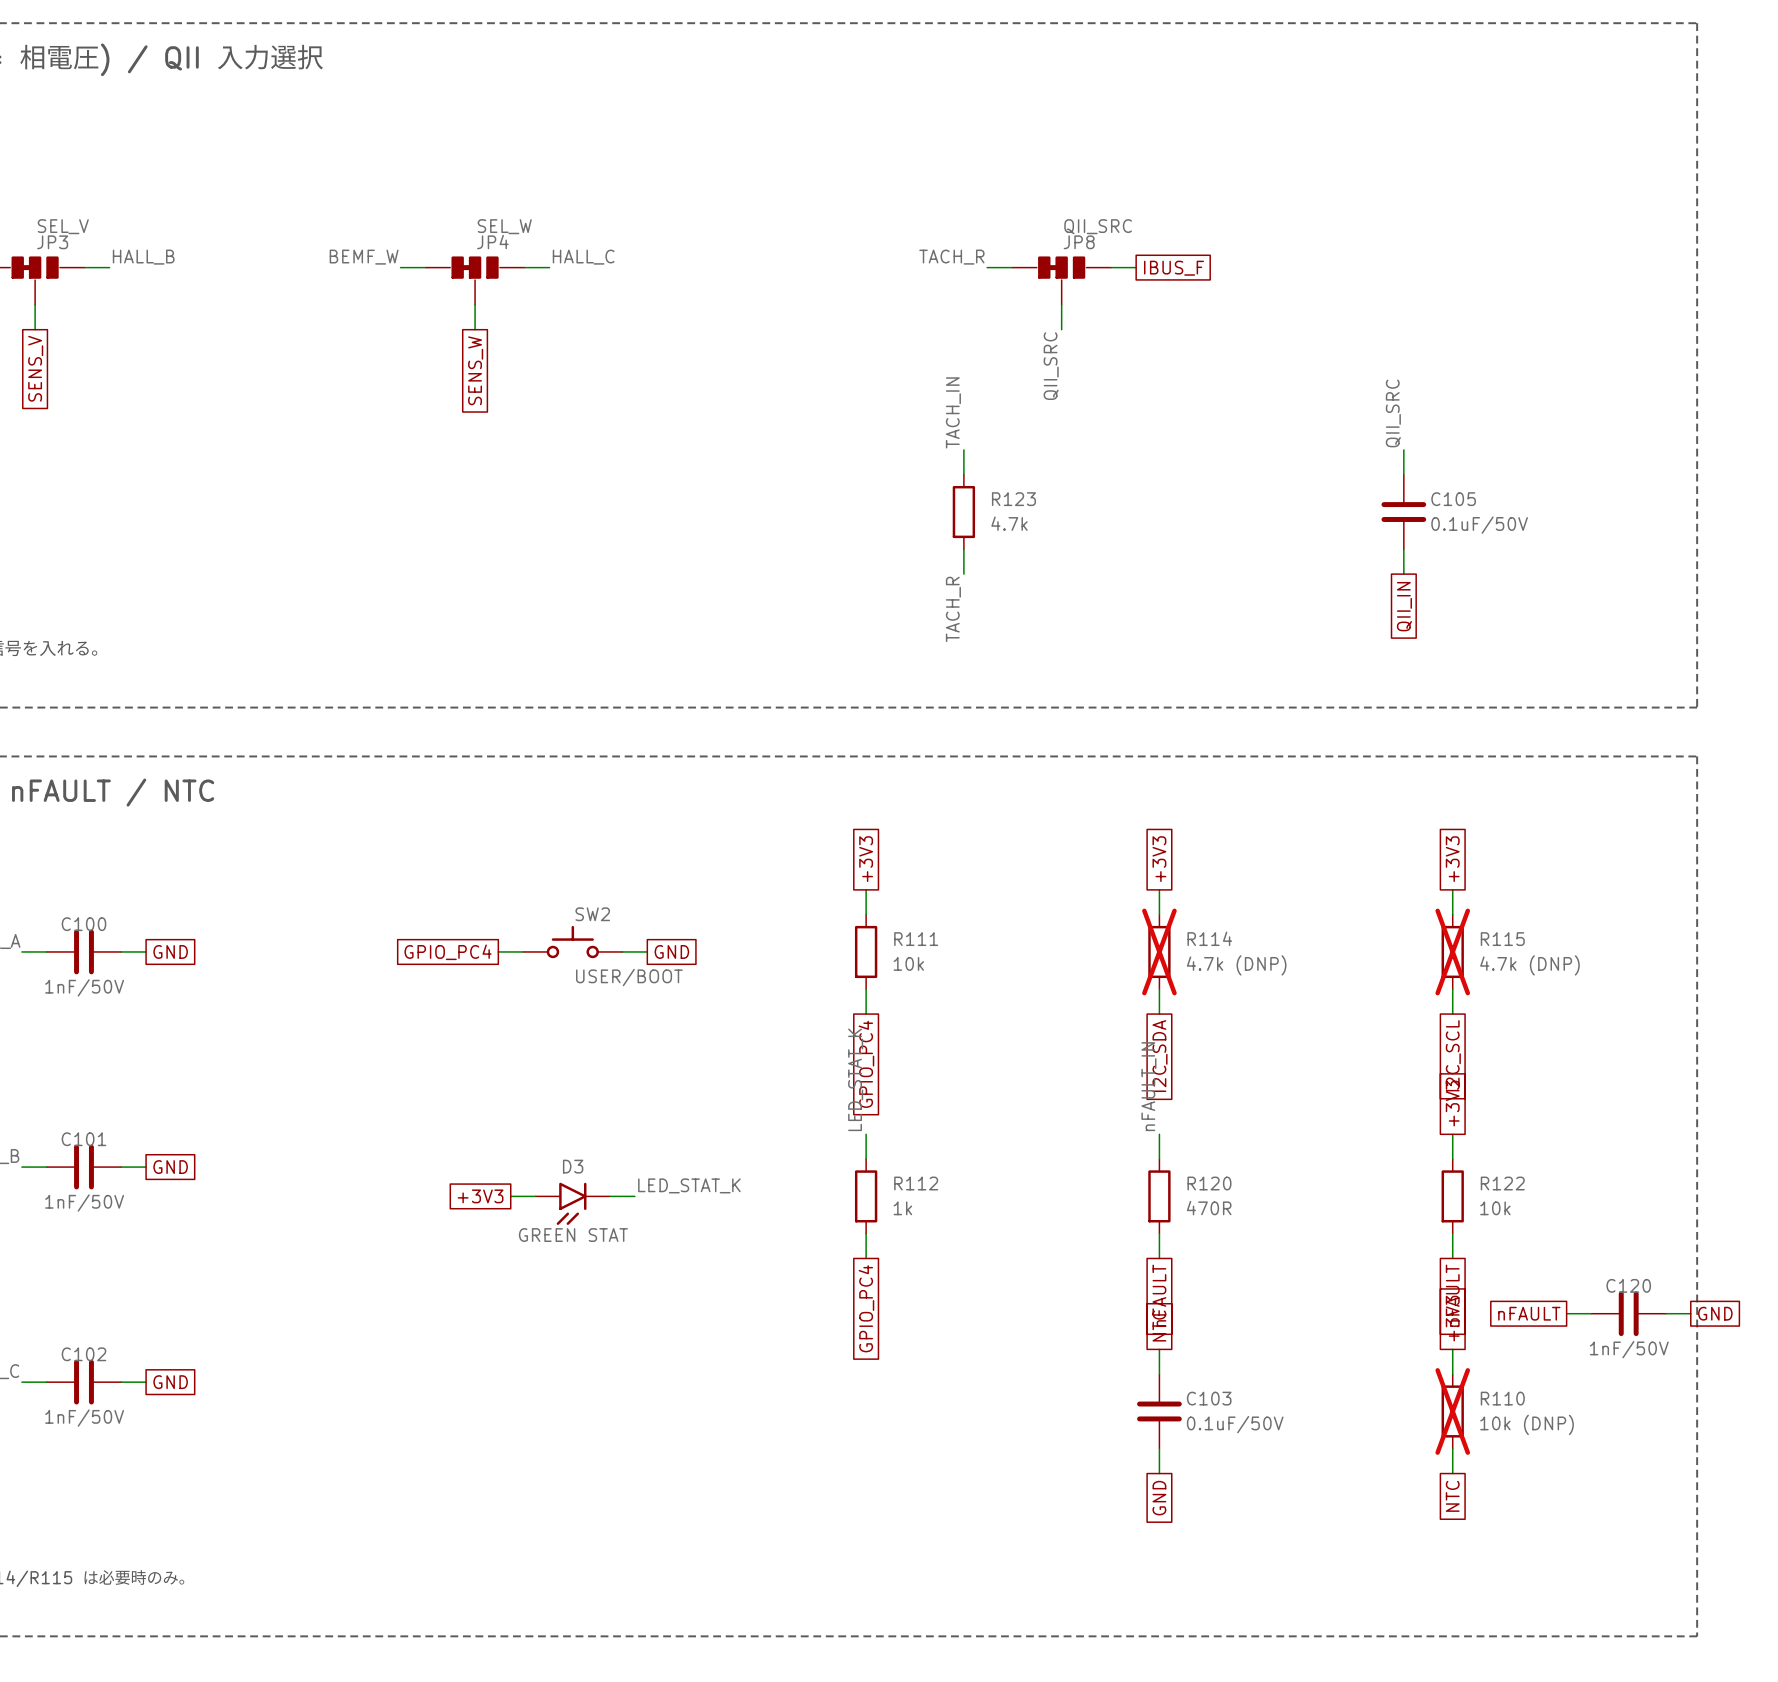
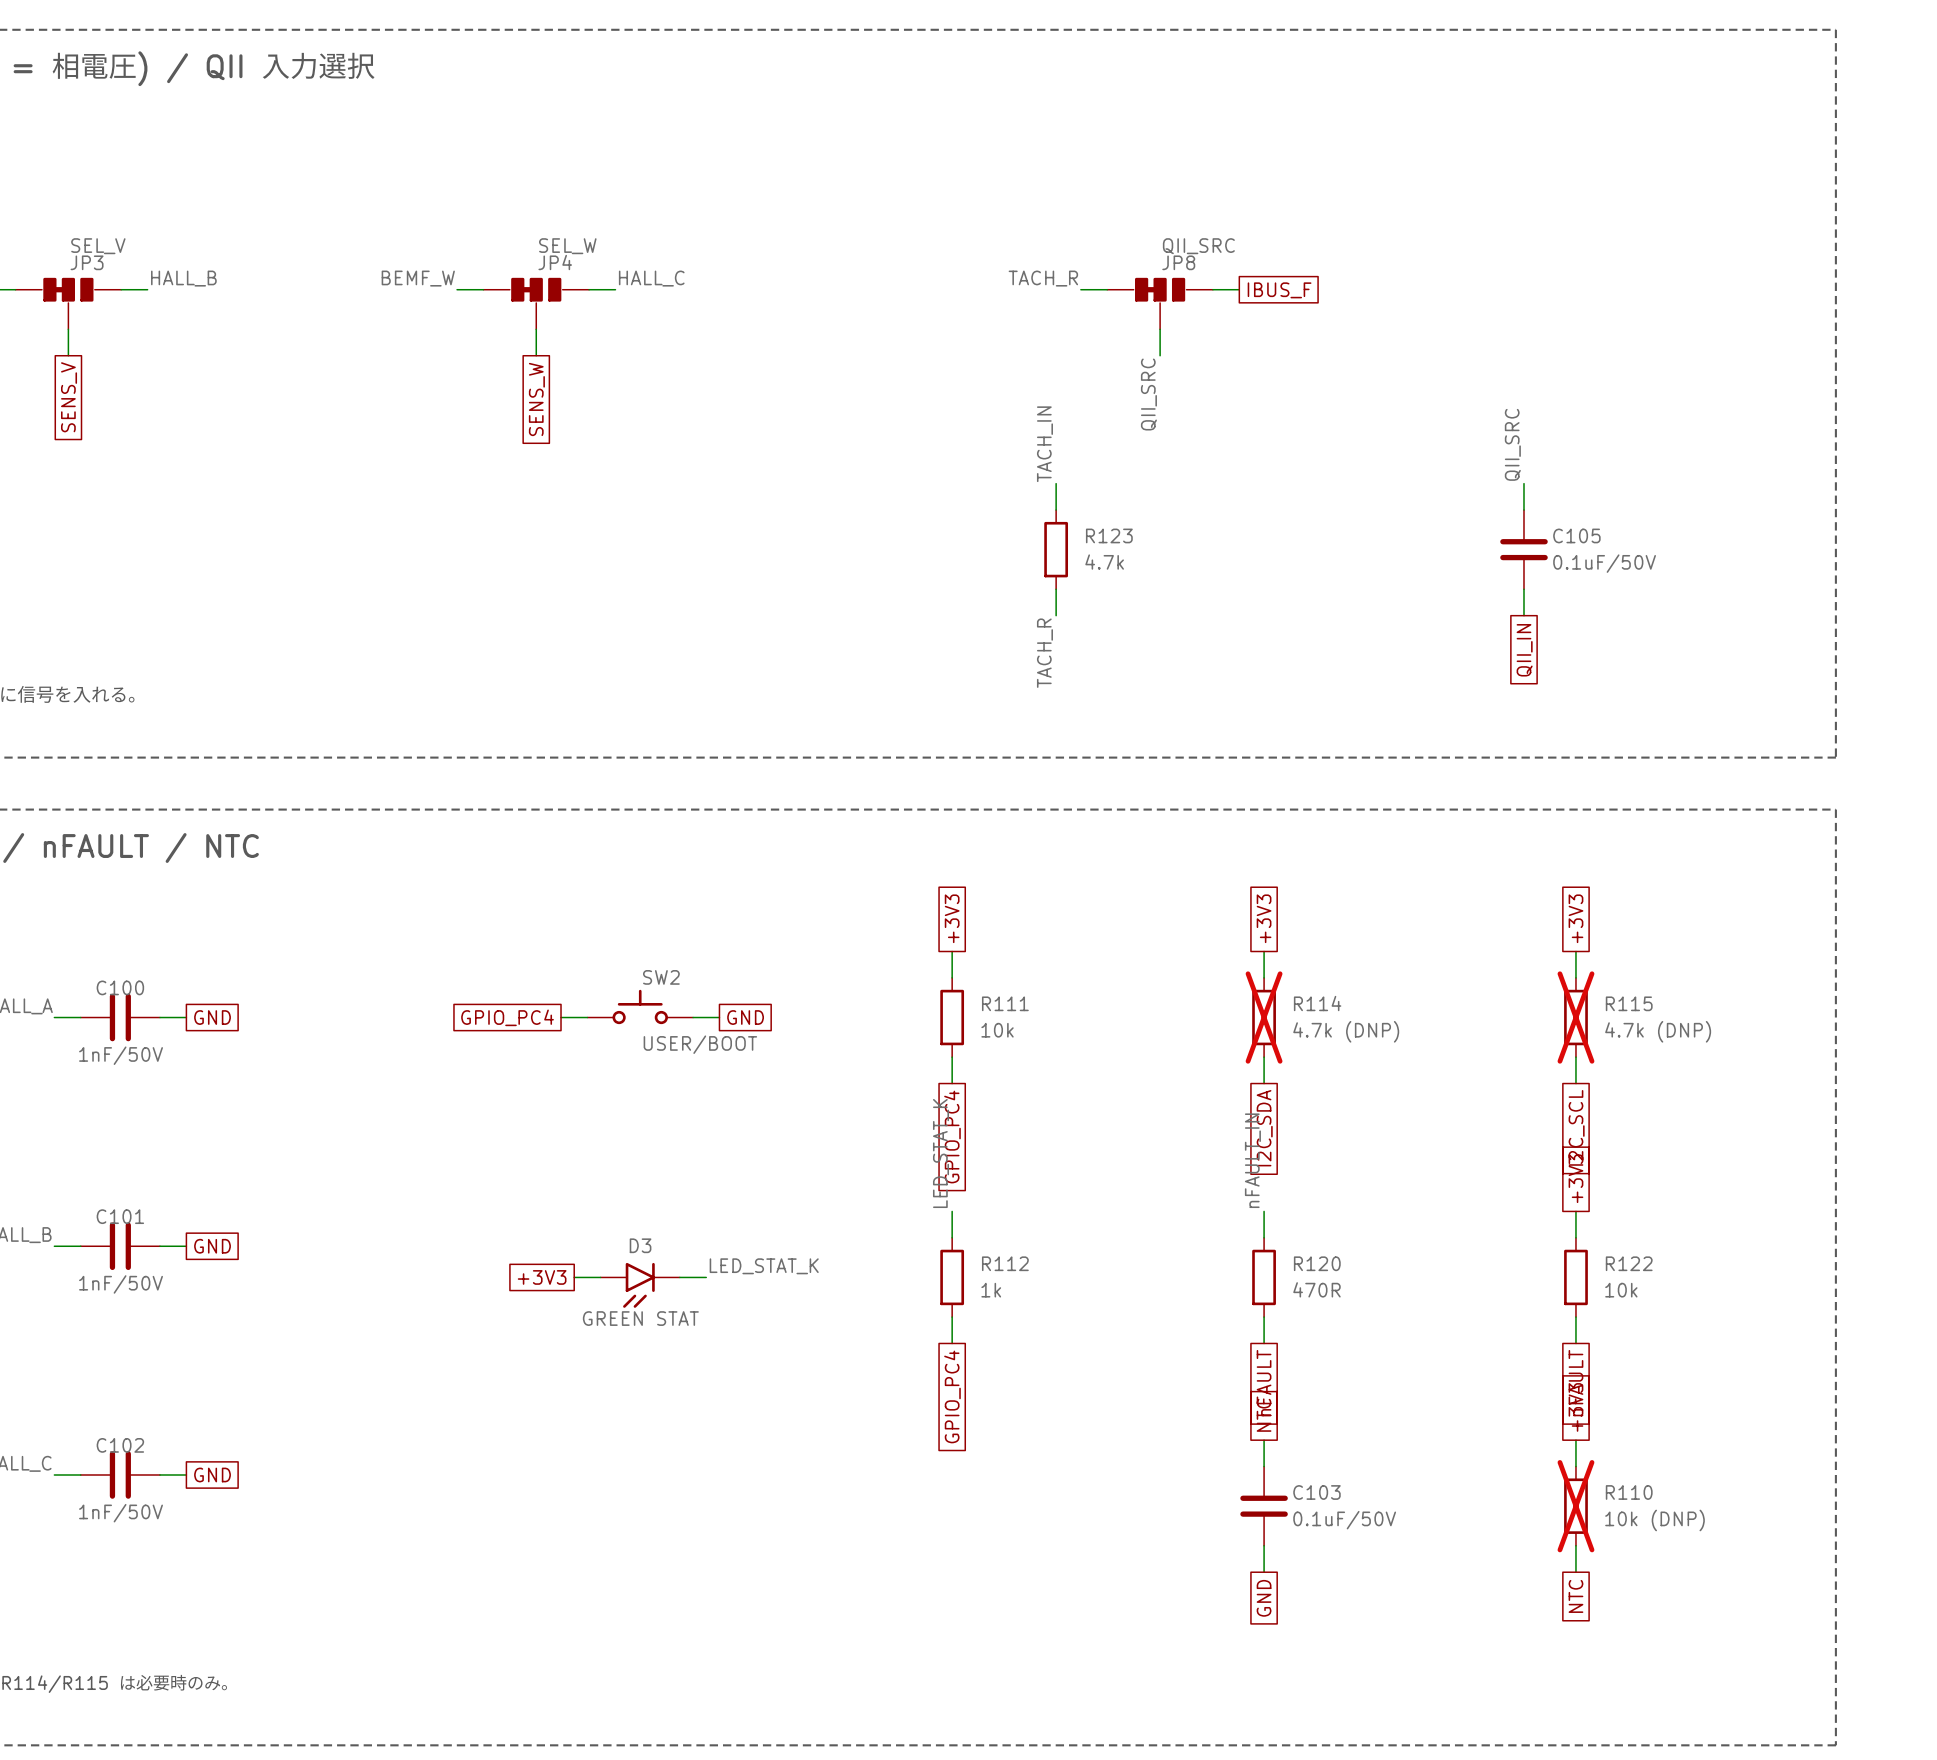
global label: nFAULT (1529, 1313) -> none
wire: (1566, 1313) (1591, 1313) -> none
C120: 1nF/50V (1628, 1313) -> none
wire: (1665, 1313) (1690, 1313) -> none
global label: GND (1715, 1313) -> none

